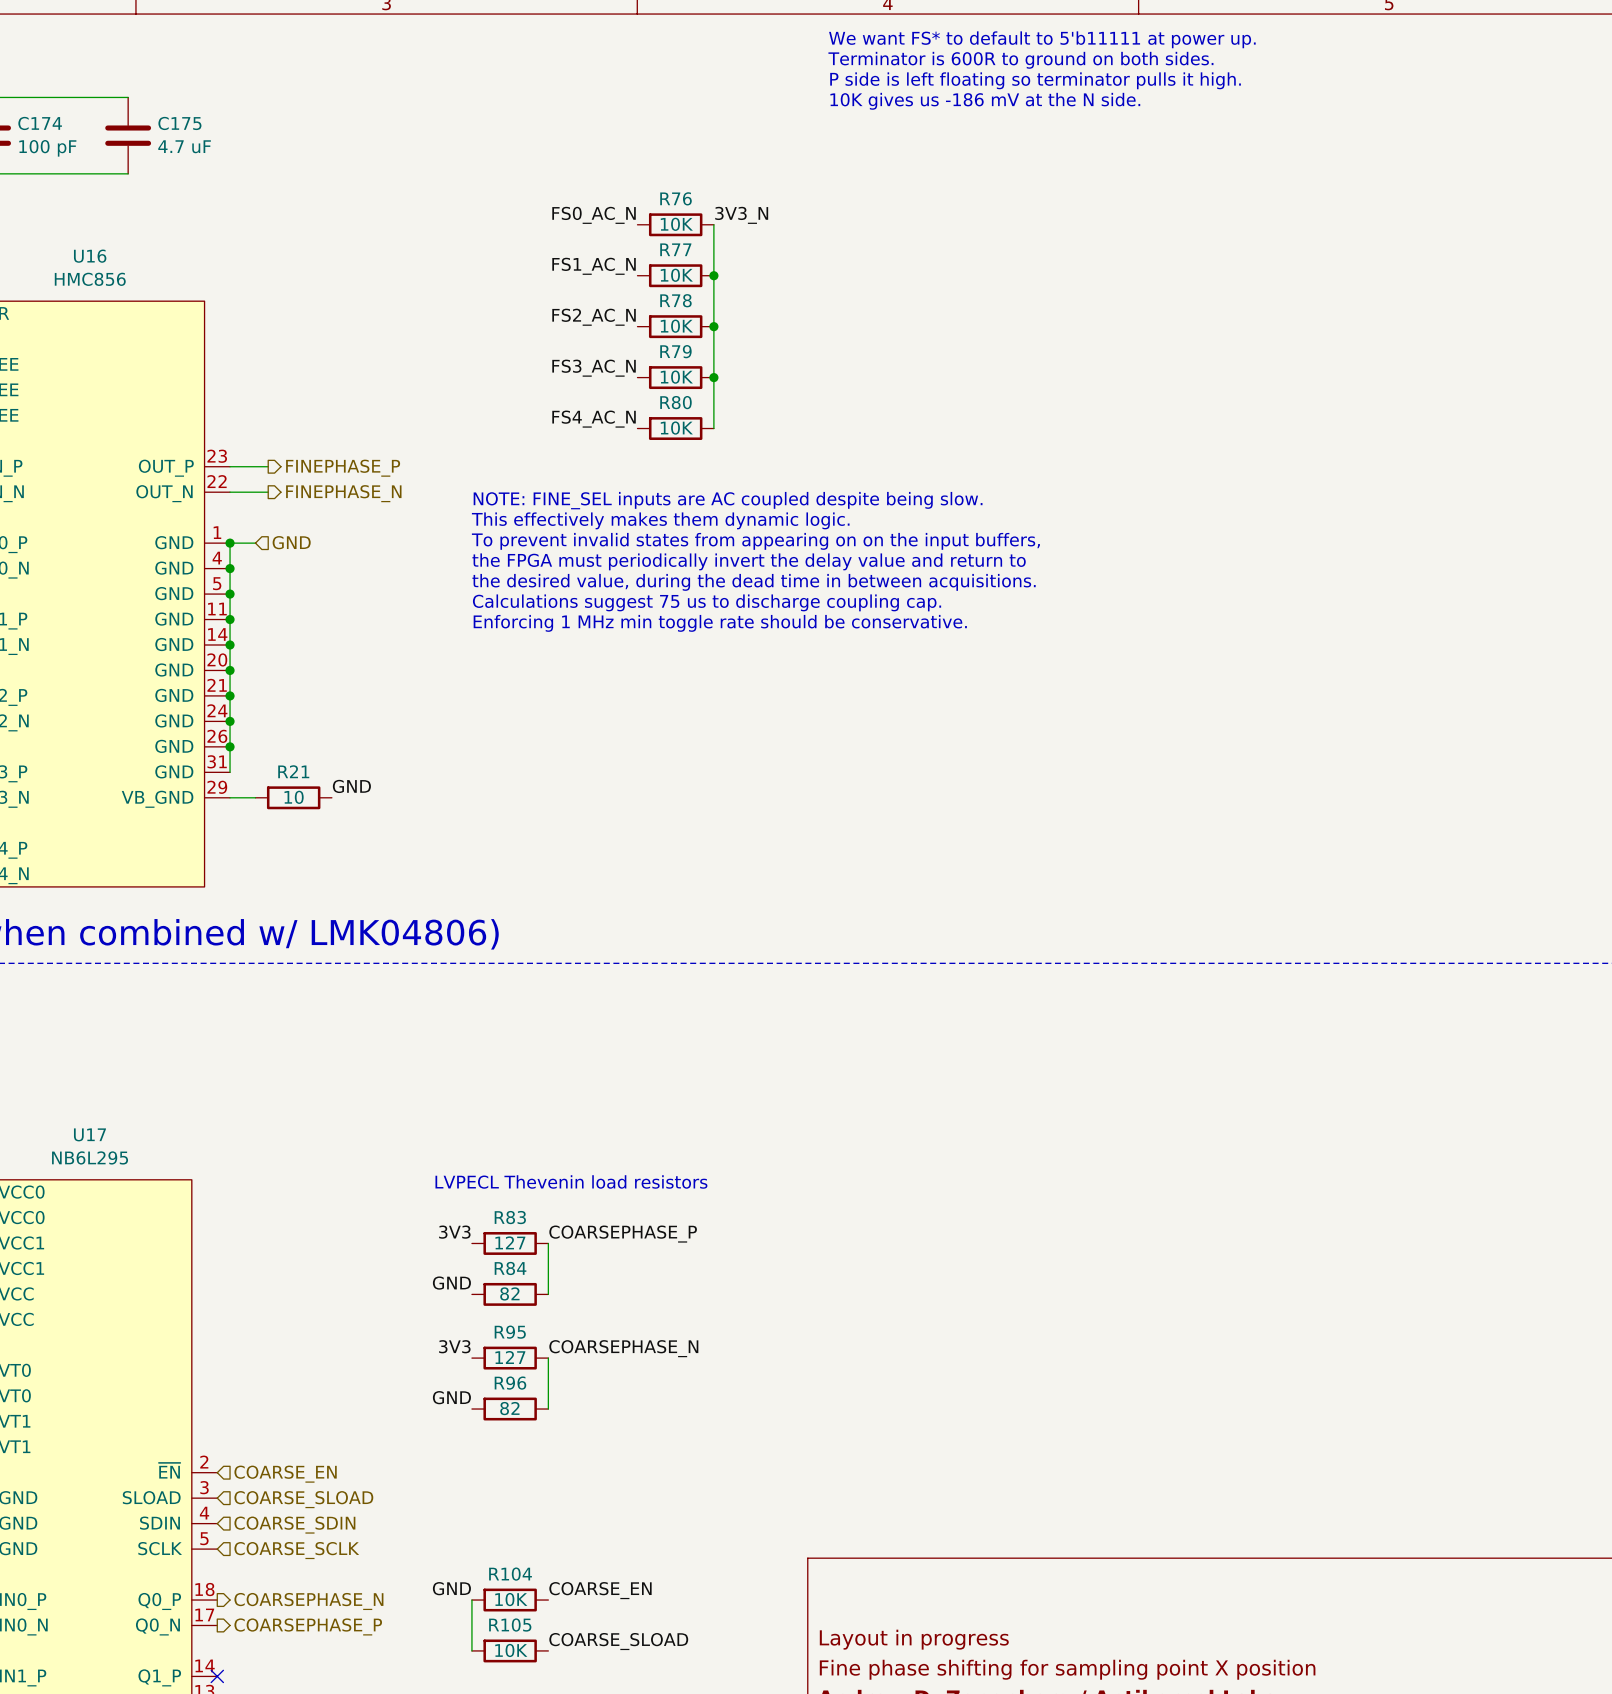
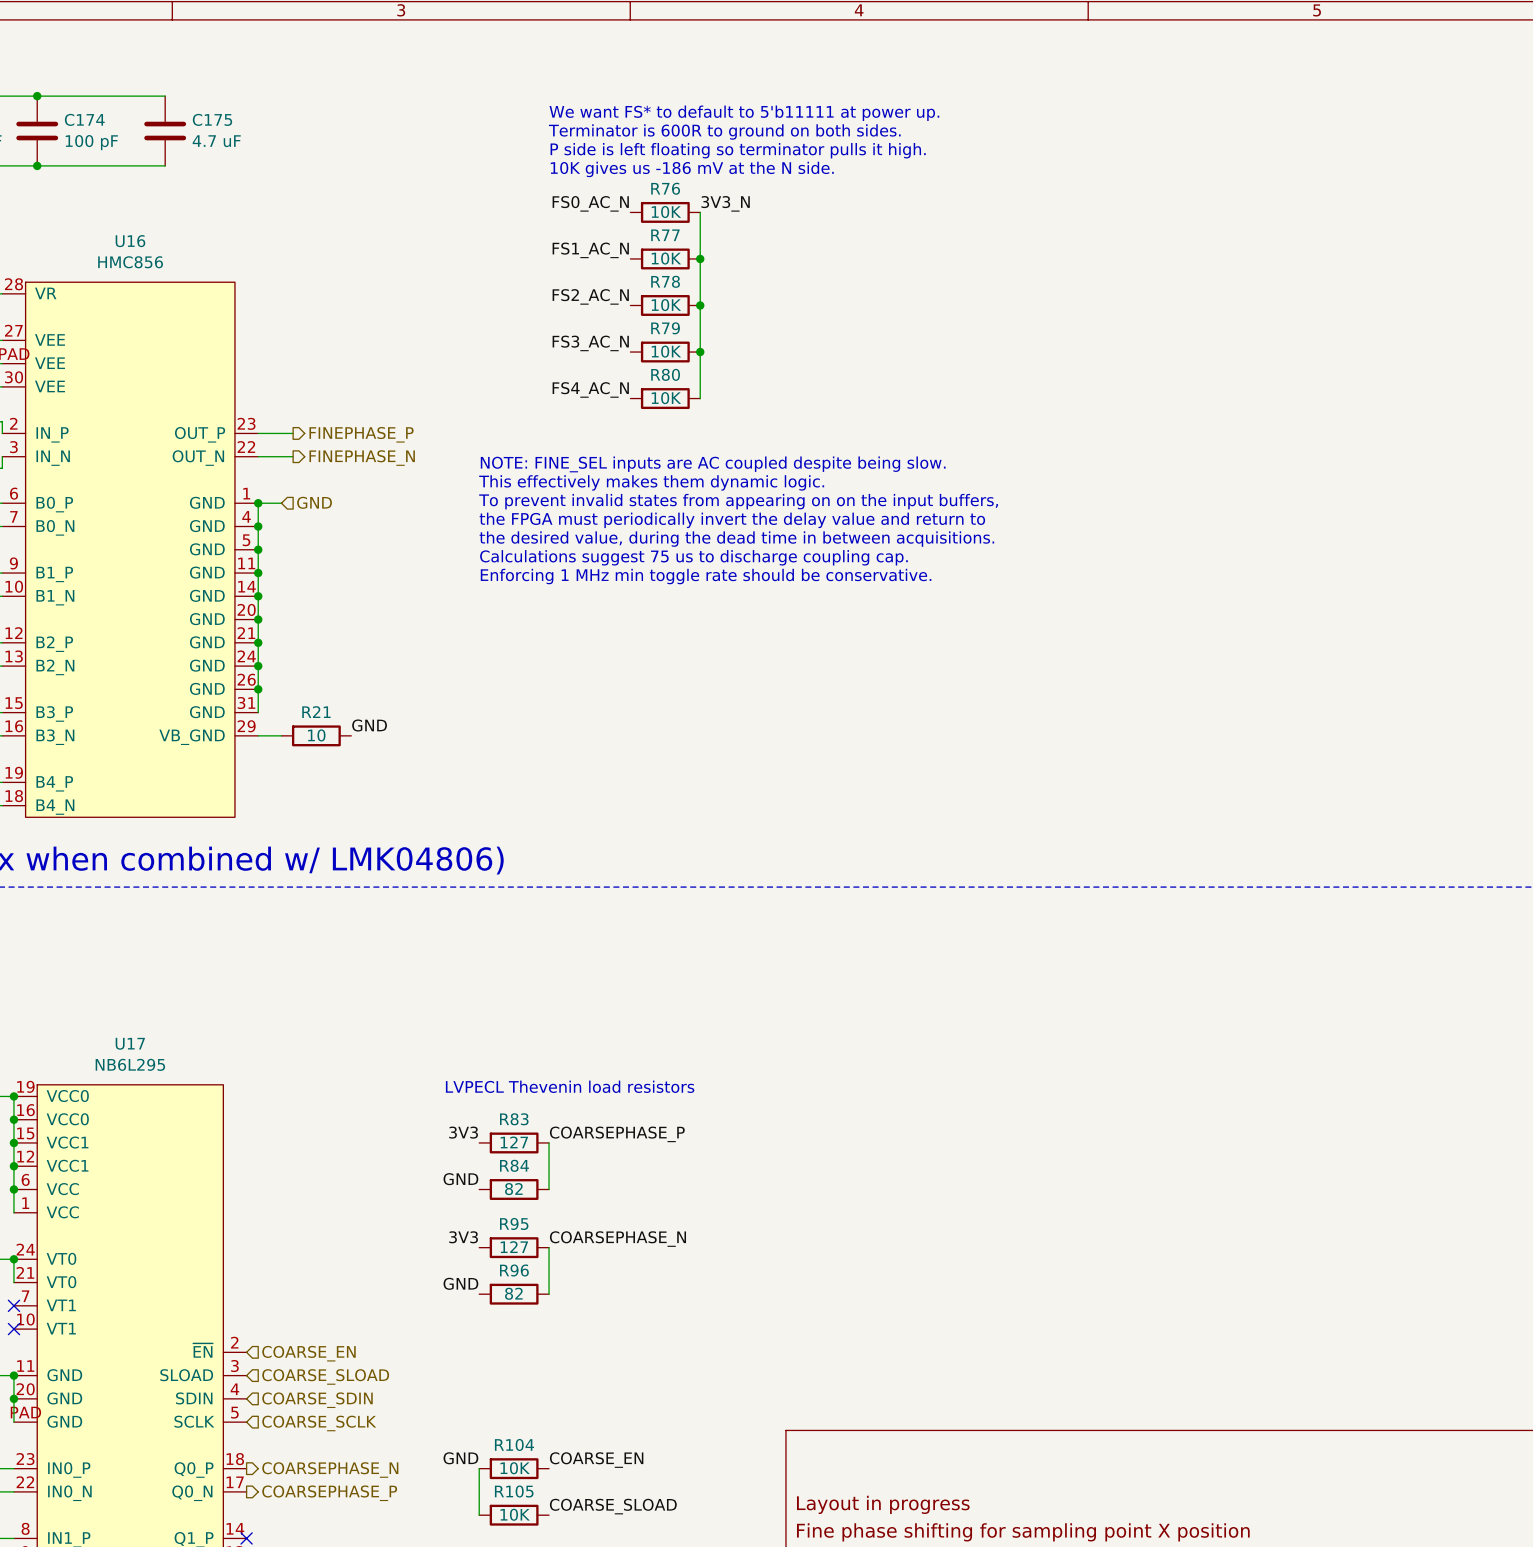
text: We want FS* to default to 5'b11111 at power up. (1042, 39) -> none
text: Terminator is 600R to ground on both sides. (1020, 60) -> none
text: P side is left floating so terminator pulls it high. (1035, 80) -> none
text: 10K gives us -186 mV at the N side. (985, 101) -> none
text: none -> We want FS* to default to 5'b11111 at power up. (744, 113)
text: none -> Terminator is 600R to ground on both sides. (724, 131)
text: none -> P side is left floating so terminator pulls it high. (738, 150)
text: none -> 10K gives us -186 mV at the N side. (692, 169)

